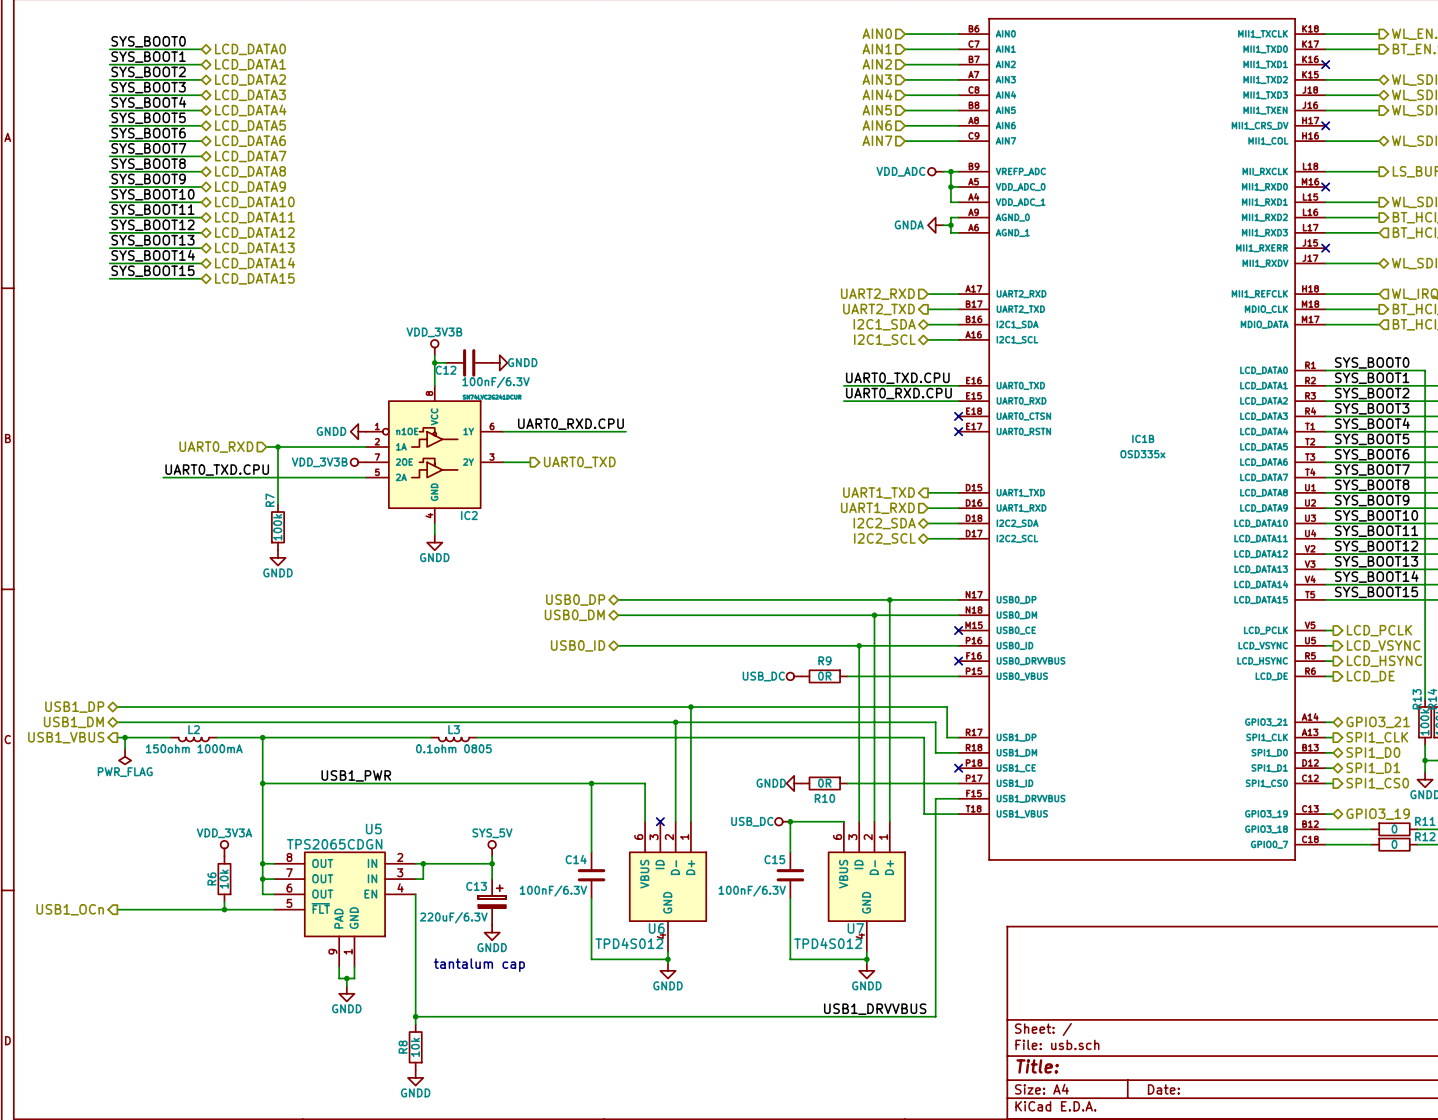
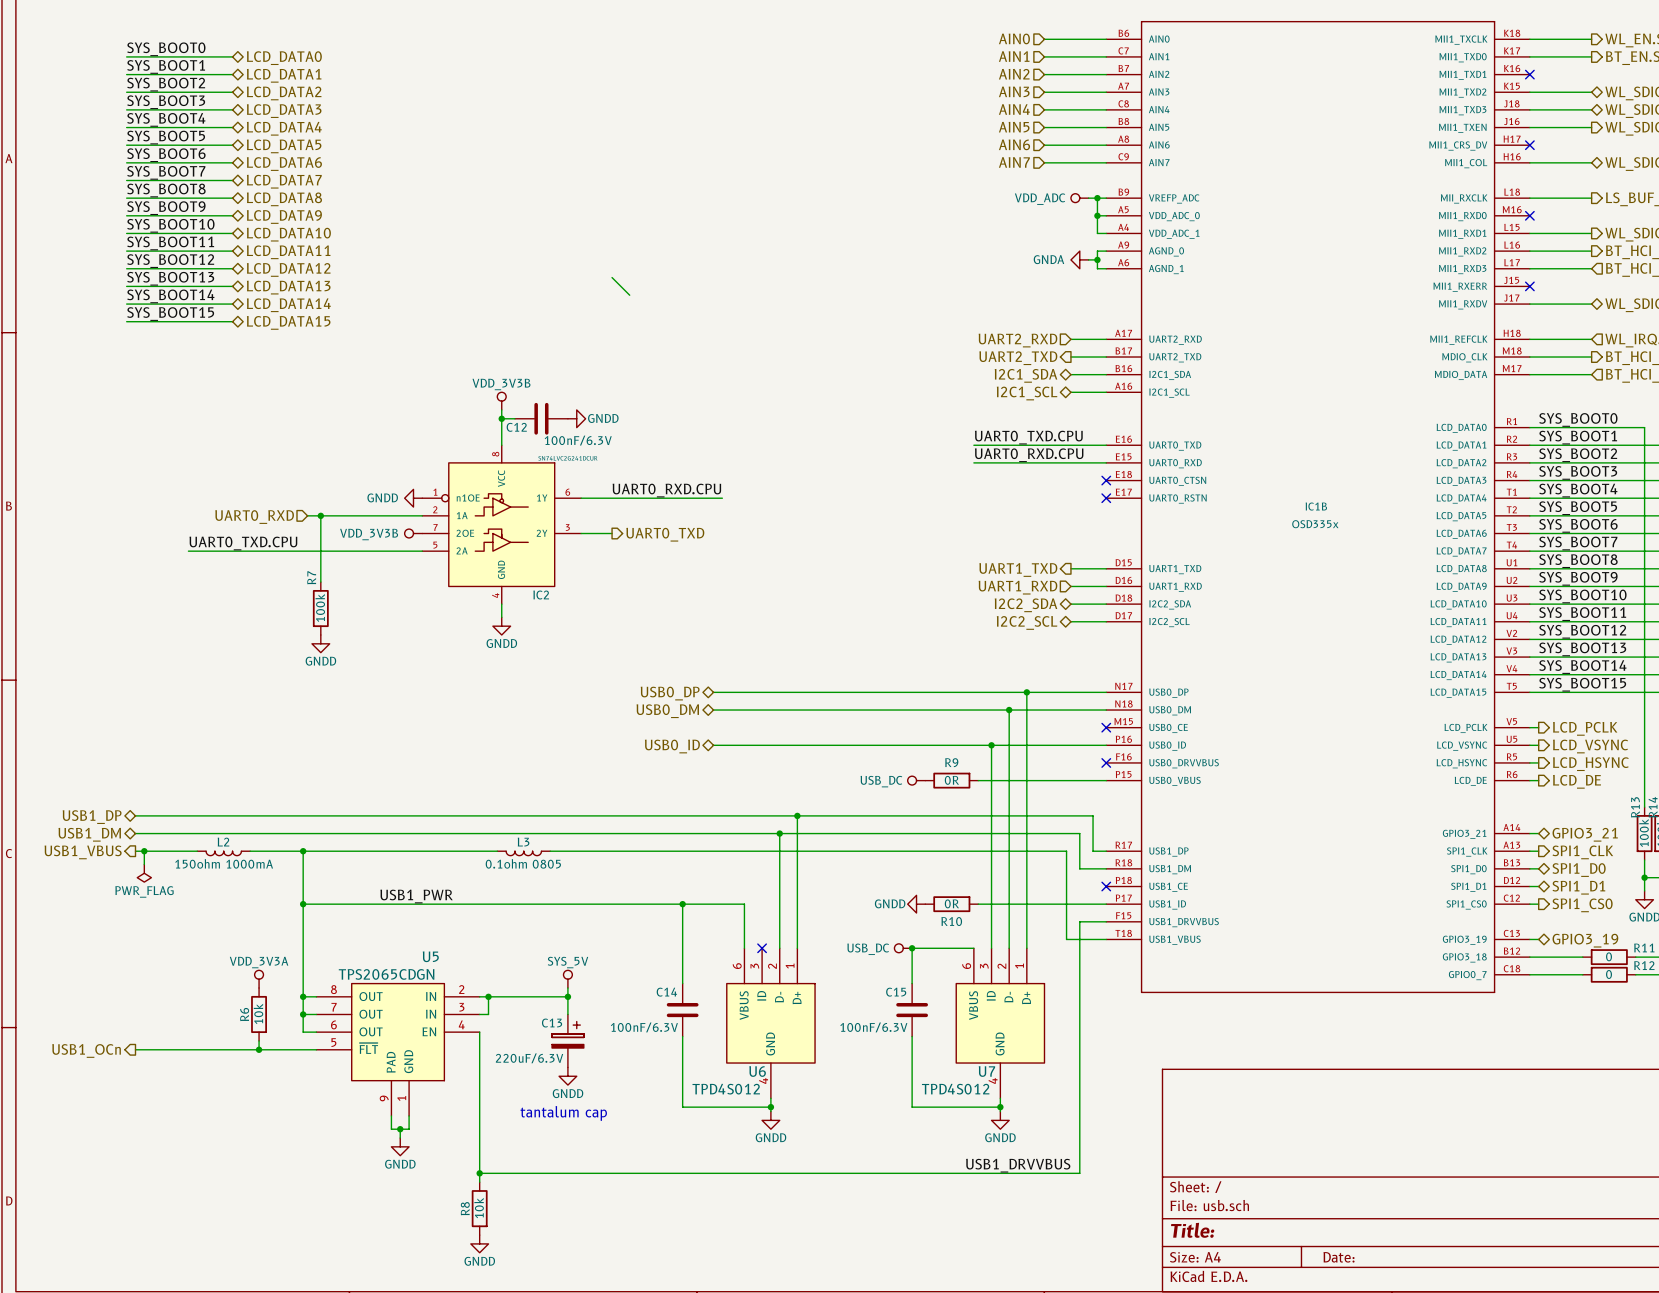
wire: none -> (612, 277) (629, 295)

